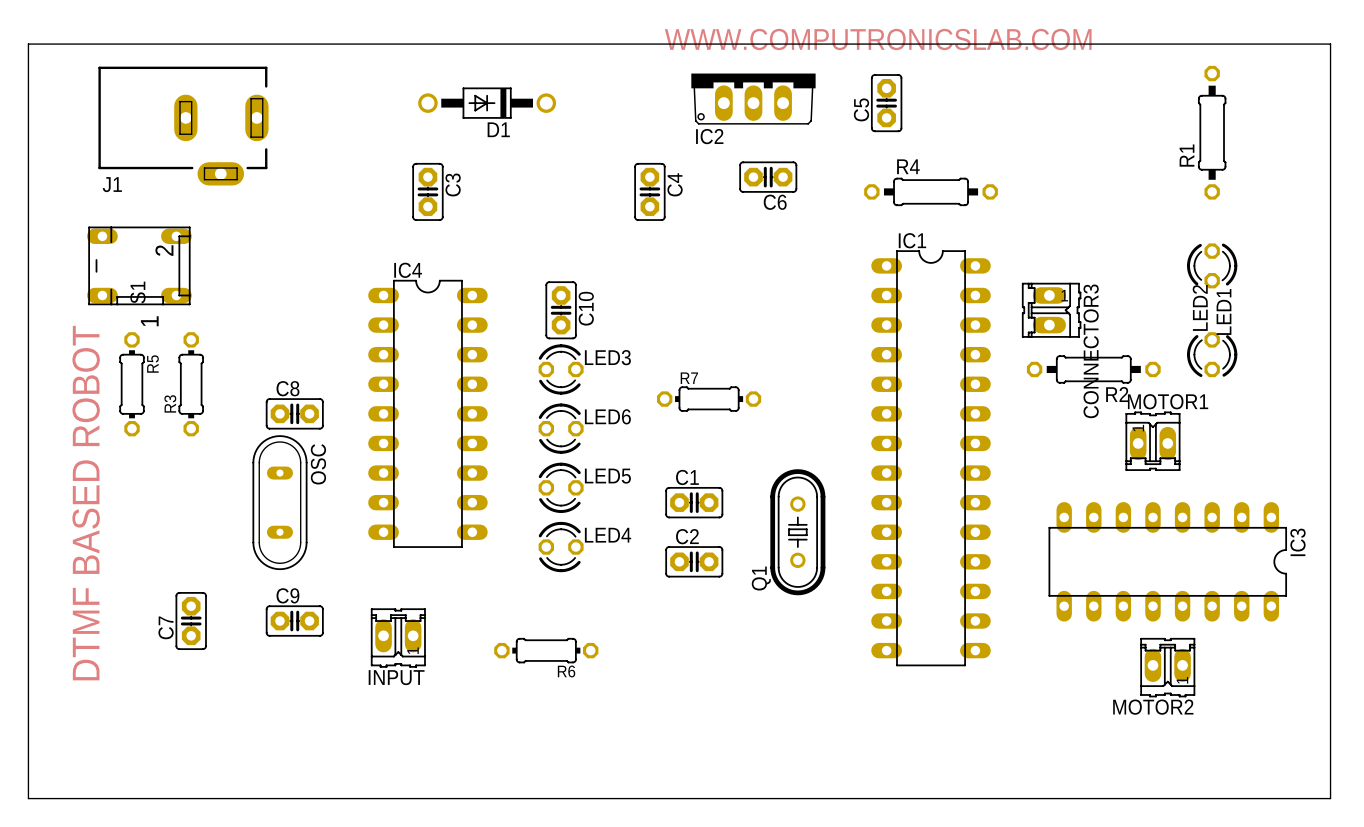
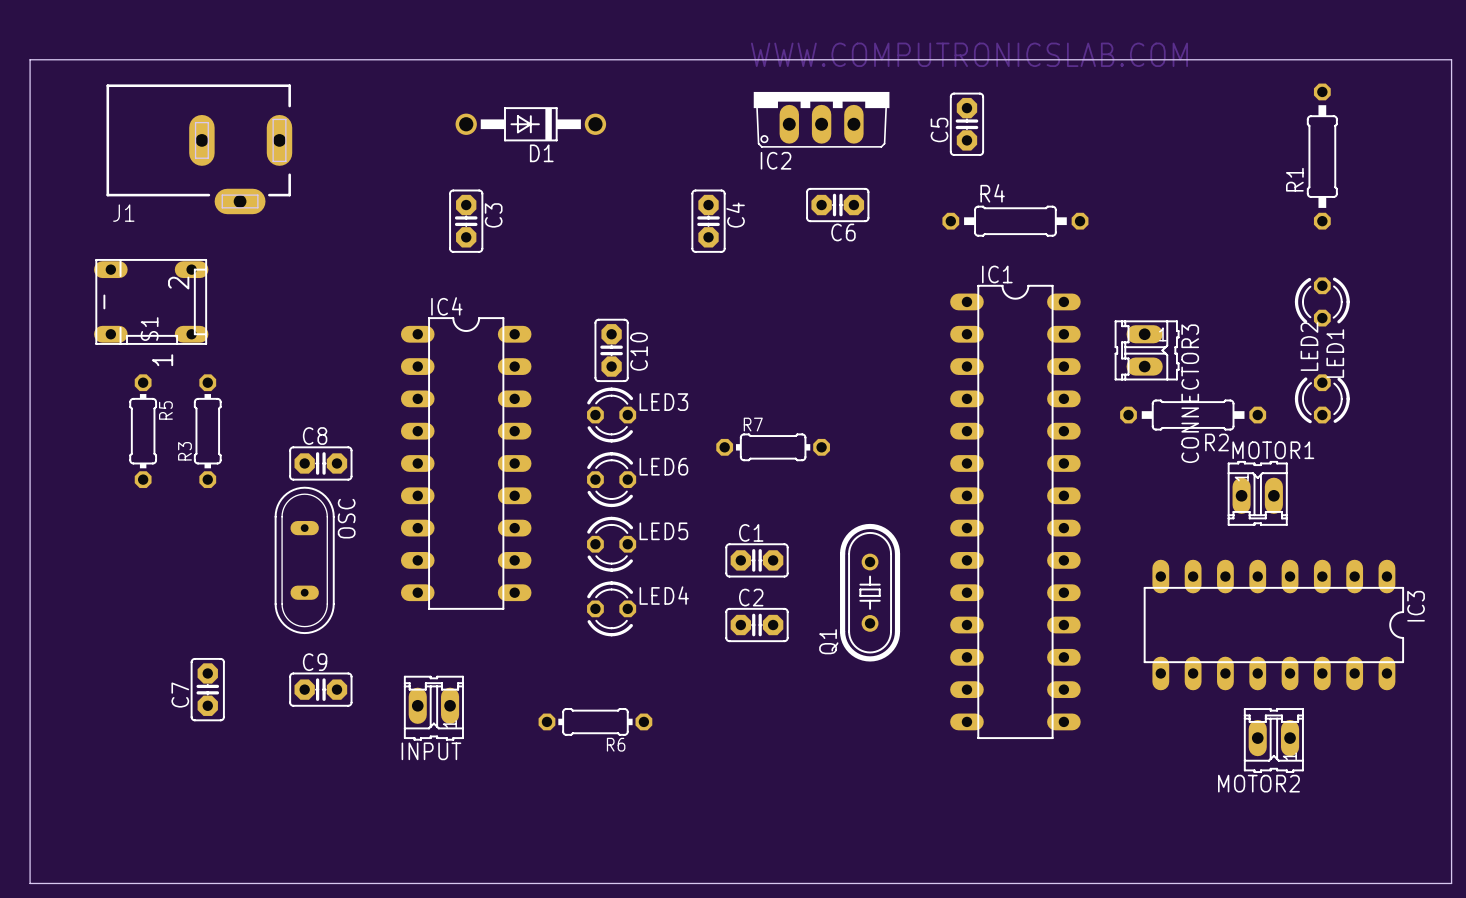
text: DTMF BASED ROBOT (86, 503) -> none

